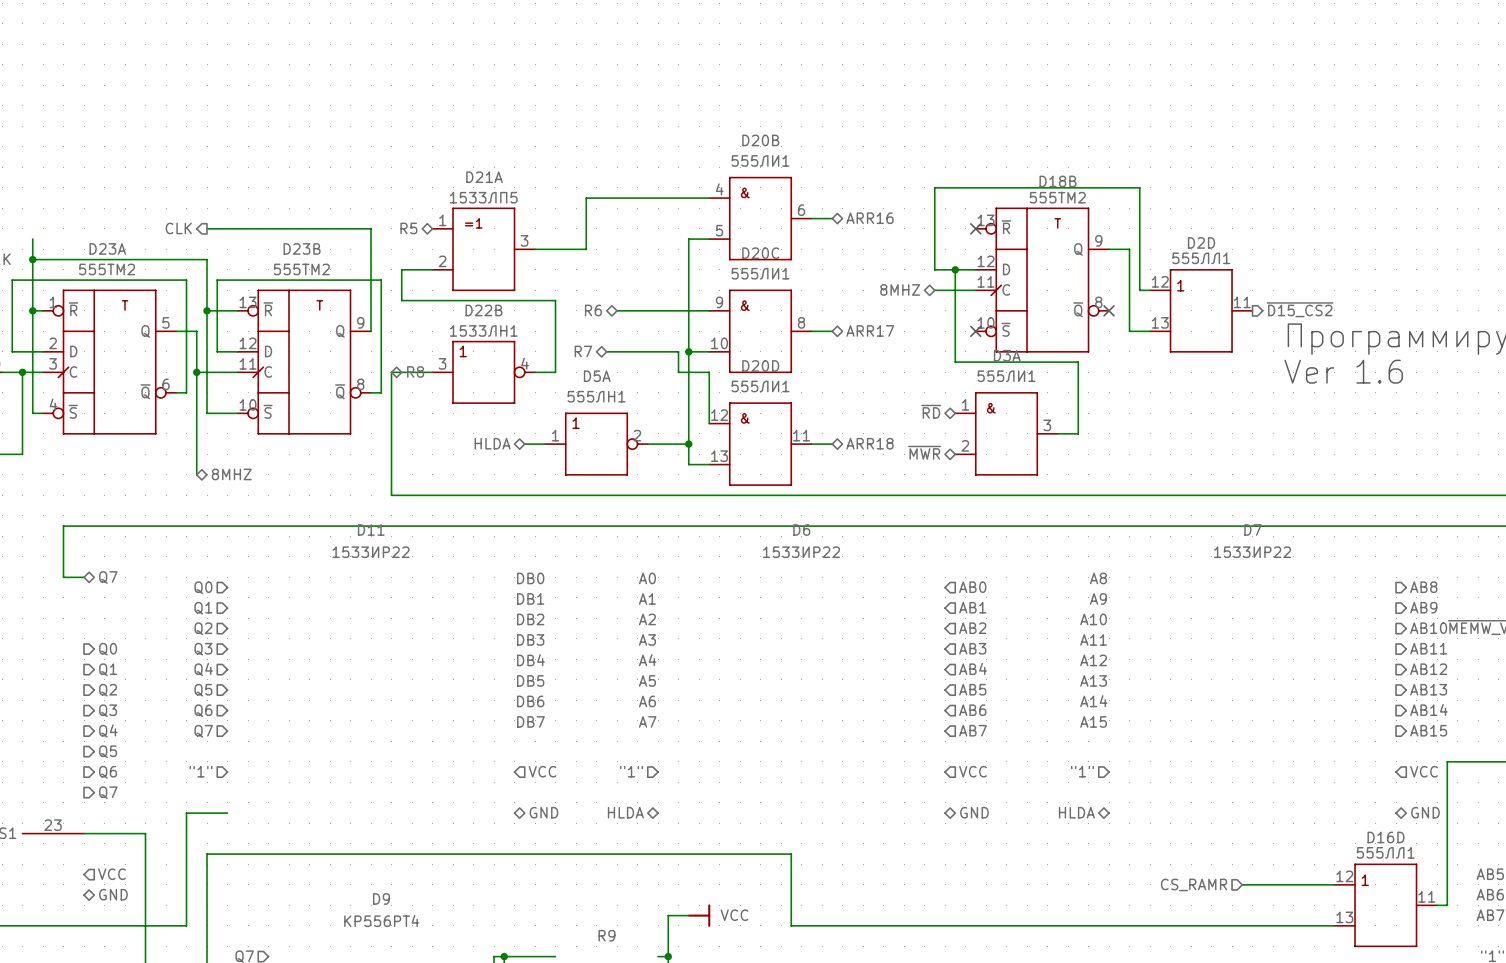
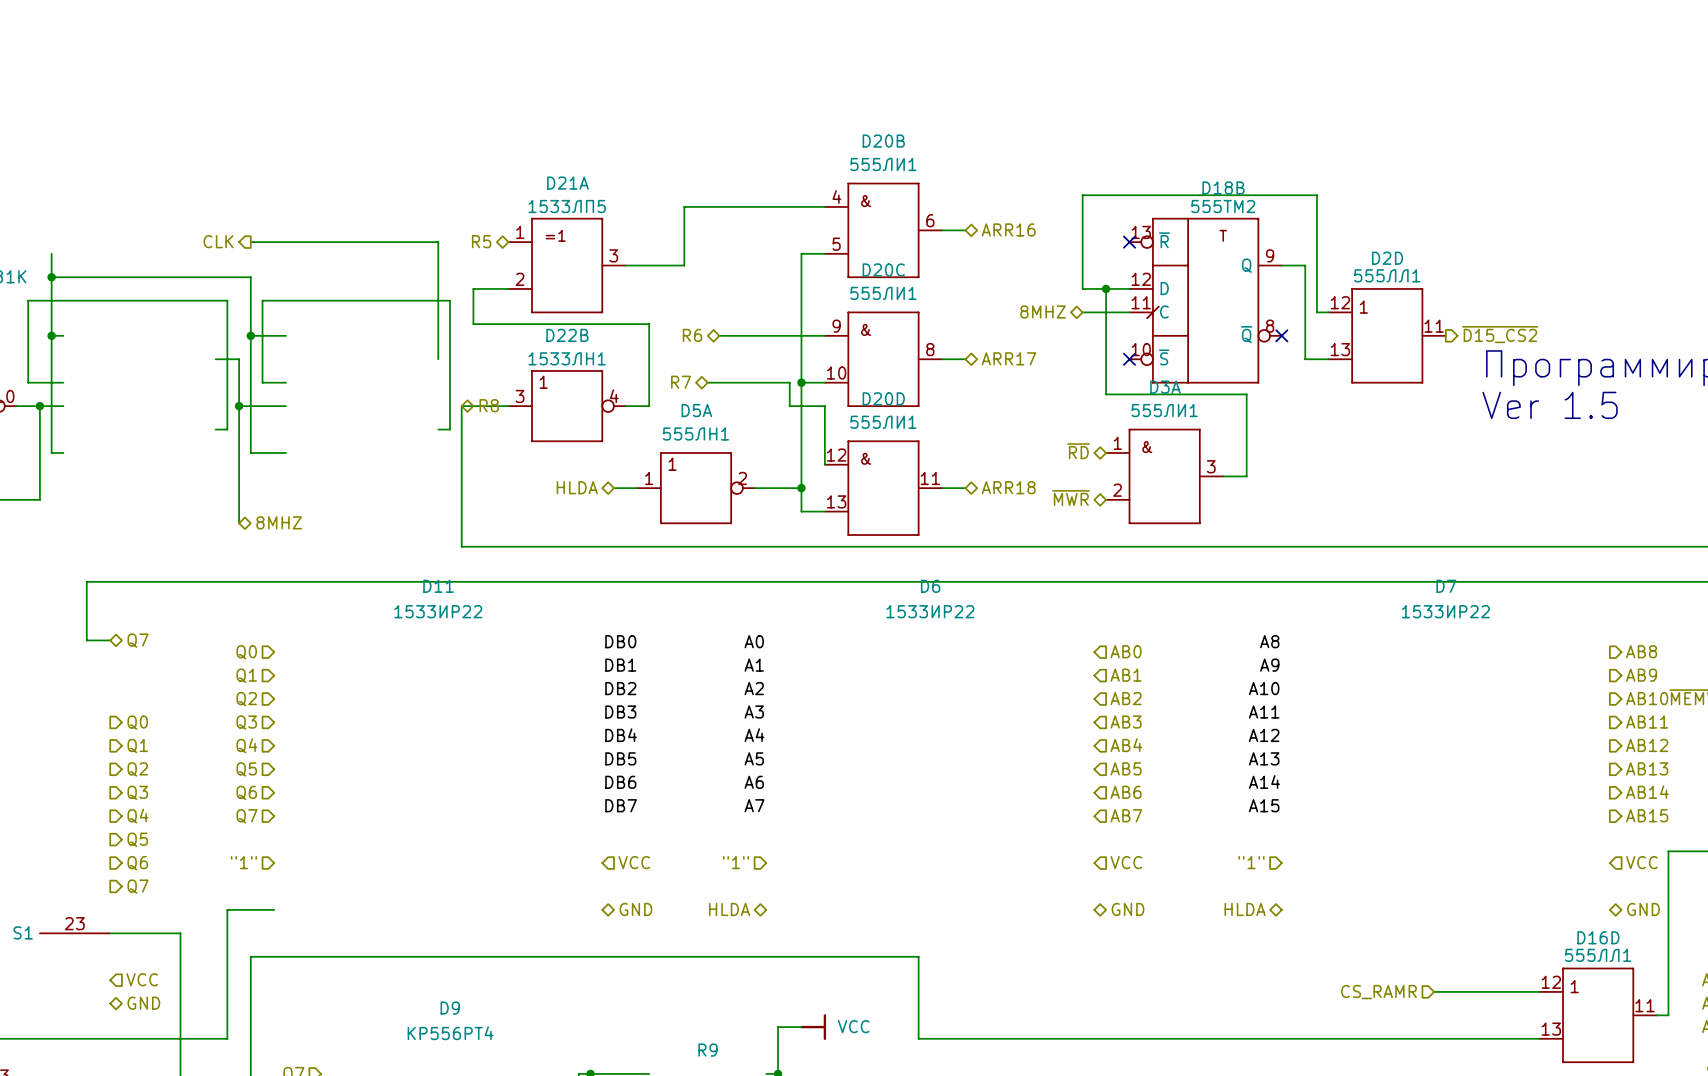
D23A: 555TM2 (109, 362) -> none
D23B: 555TM2 (304, 362) -> none
text: Ver 1.6 (1343, 371) -> Ver 1.5 (1550, 405)

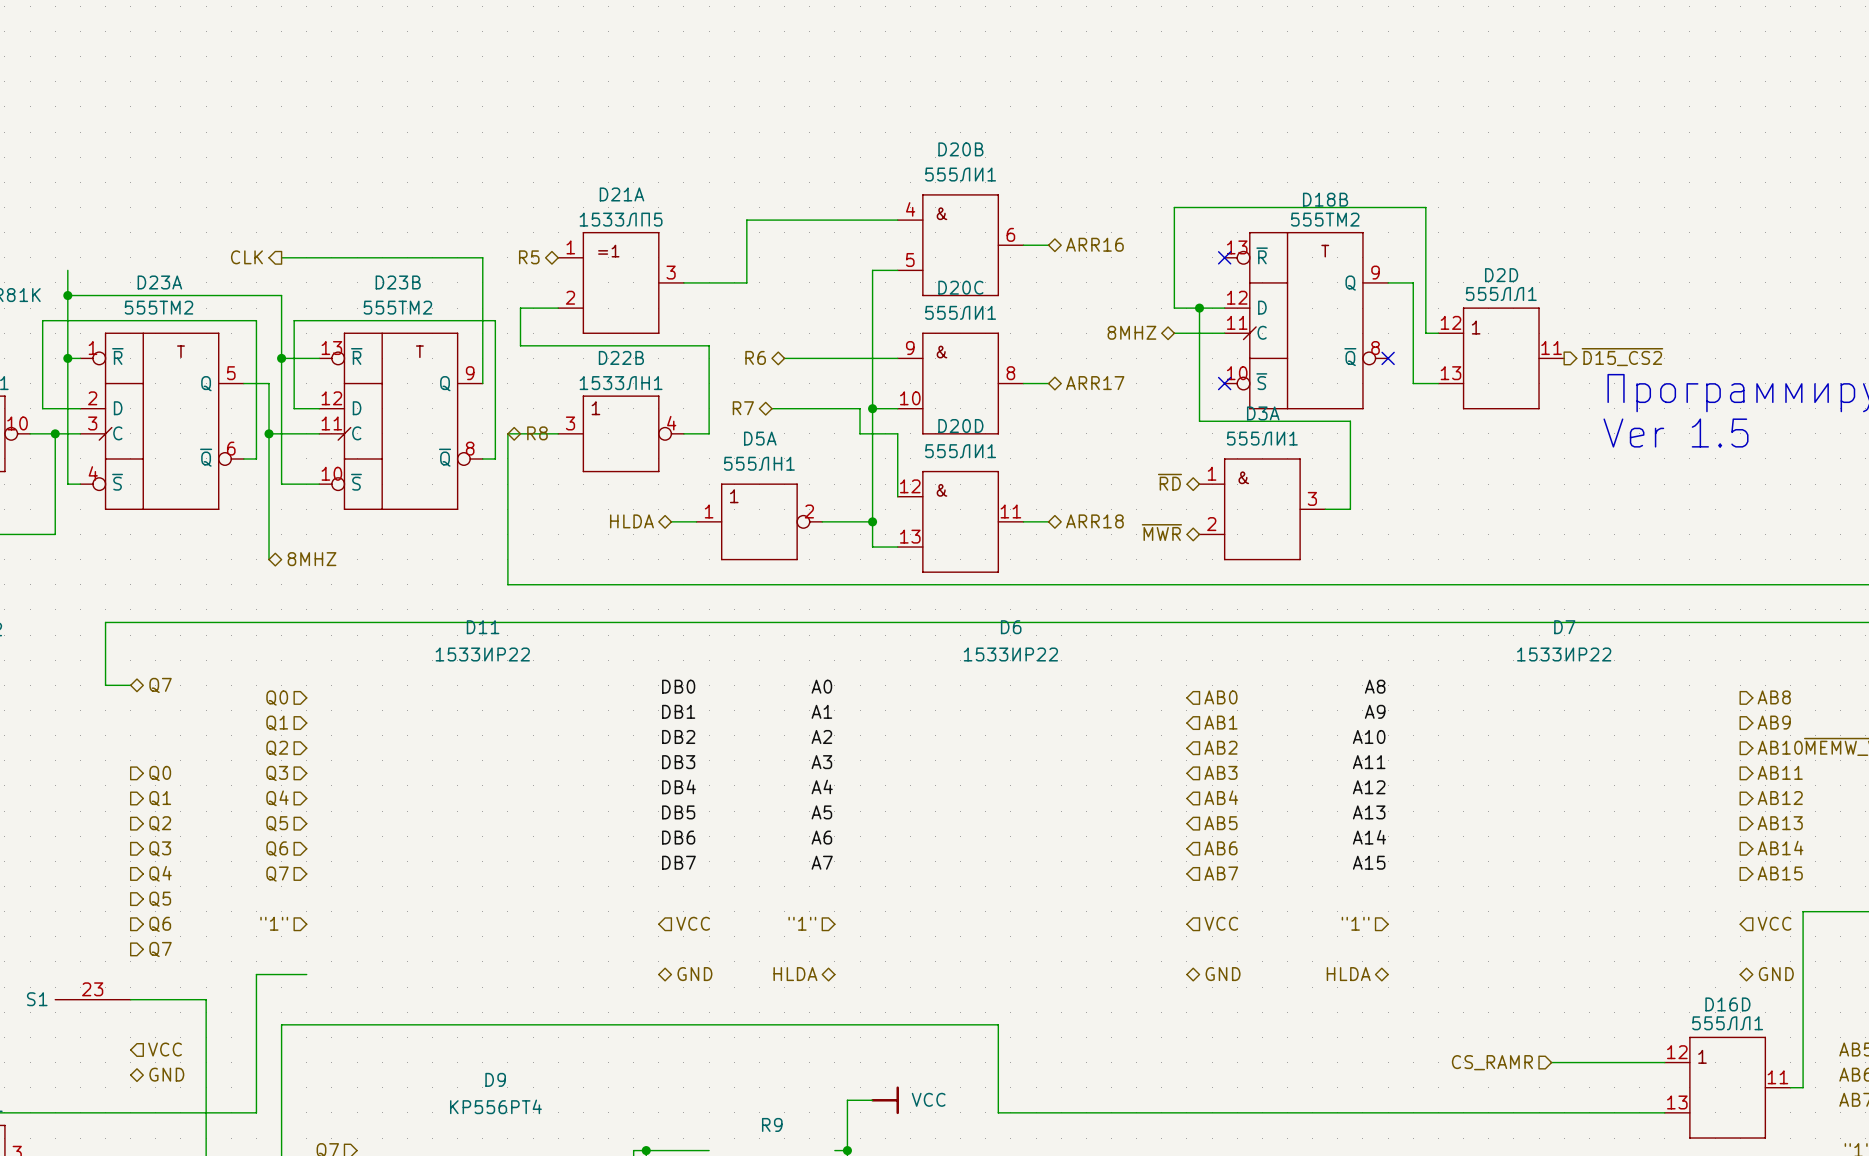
D23A: none -> 555TM2 (162, 421)
D23B: none -> 555TM2 (401, 421)

